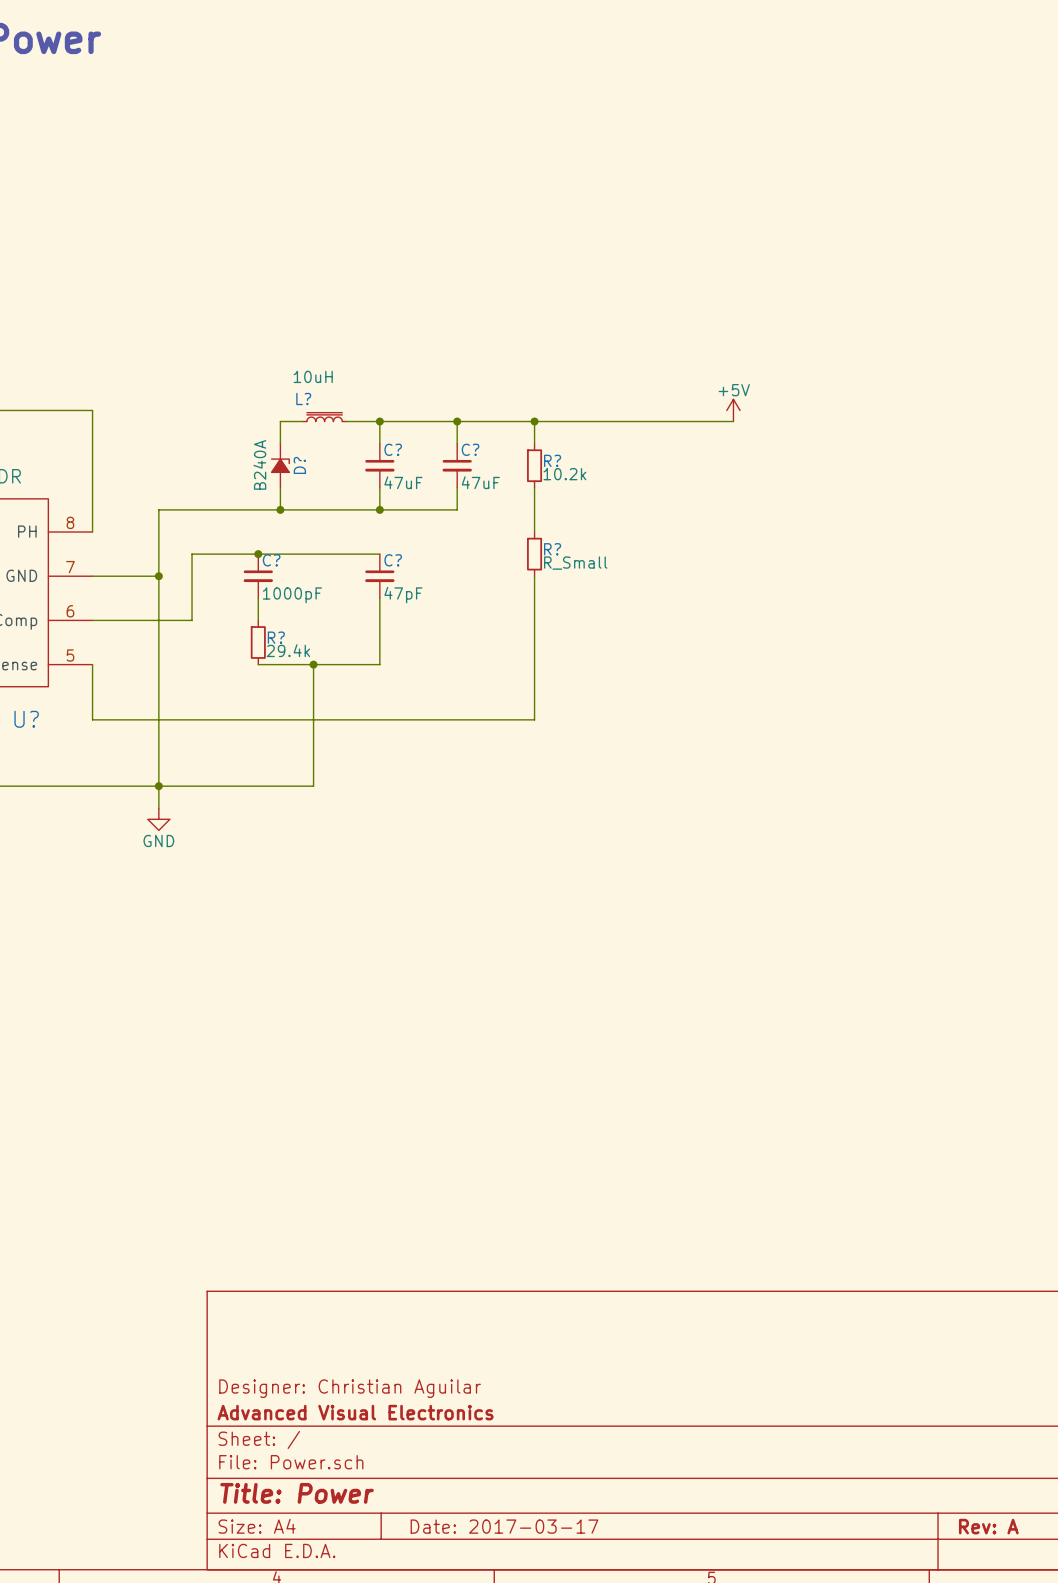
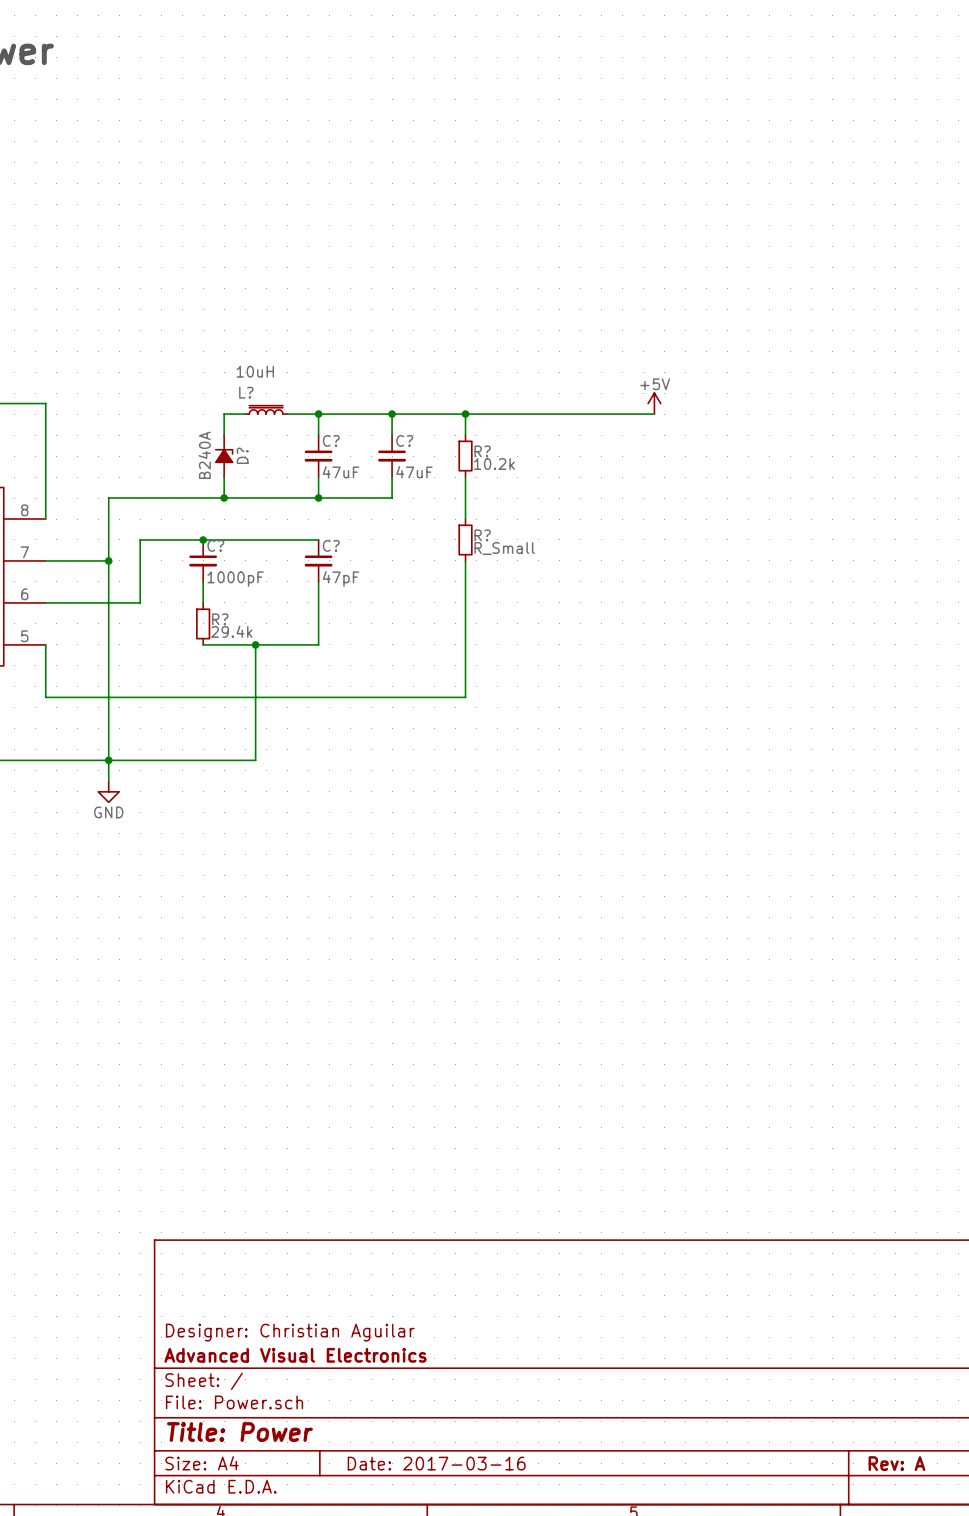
title block: Date: 2017-03-17 (504, 1526) -> Date: 2017-03-16 (436, 1463)

